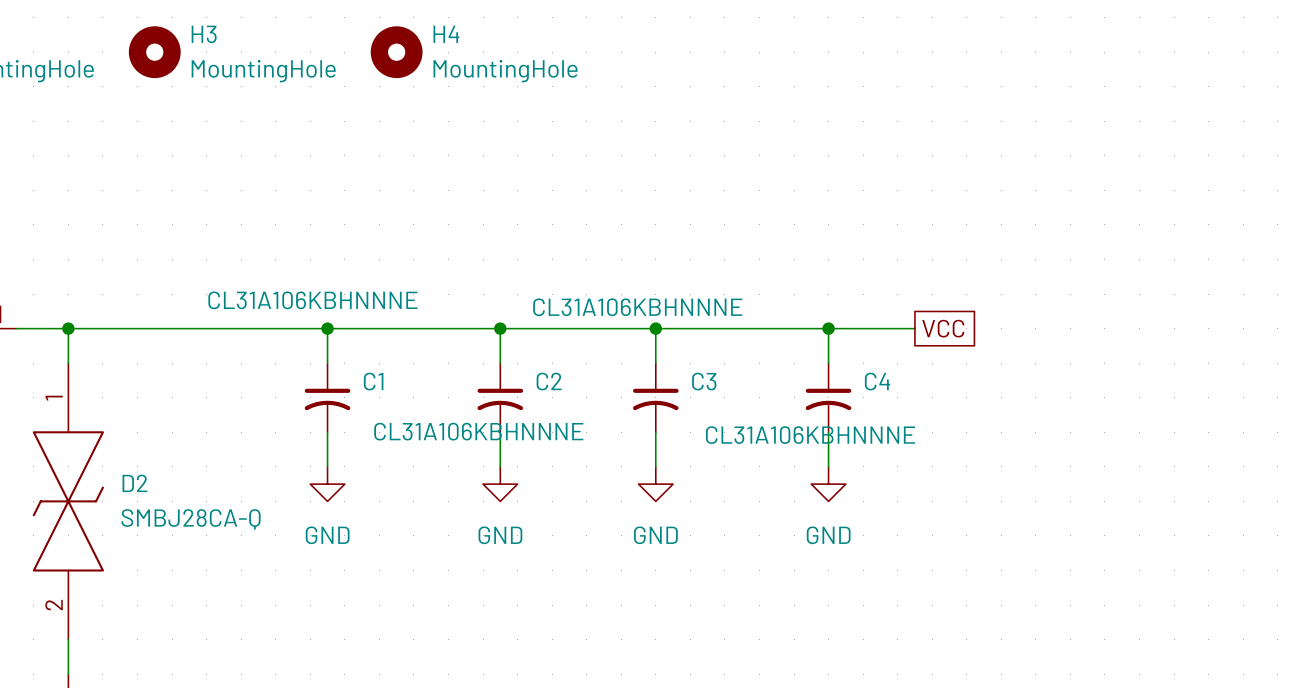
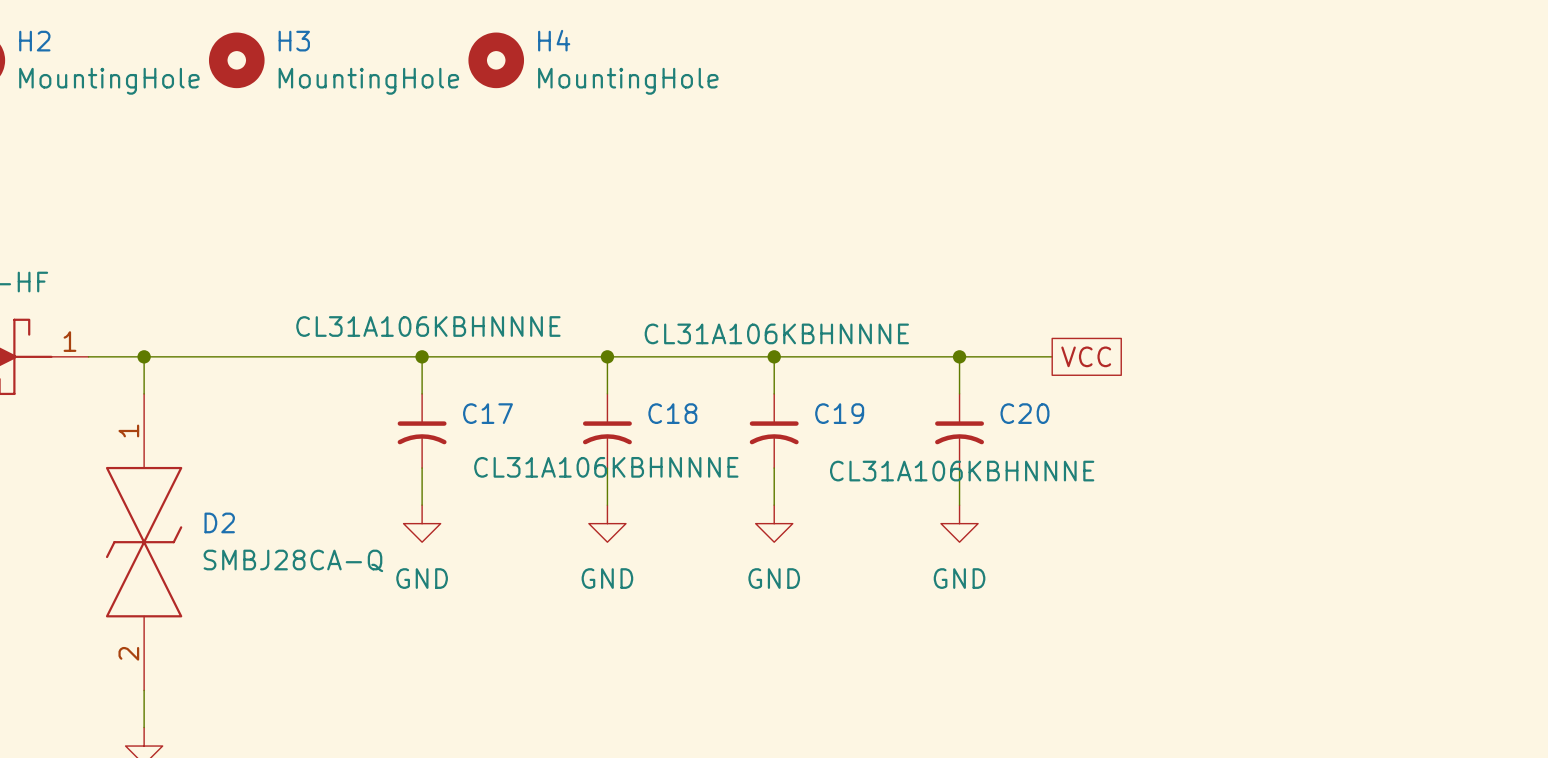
C1 name: C1 (373, 381) -> C17 (487, 413)
C2 name: C2 (549, 381) -> C18 (672, 413)
C3 name: C3 (704, 381) -> C19 (839, 413)
C4 name: C4 (877, 381) -> C20 (1024, 413)

